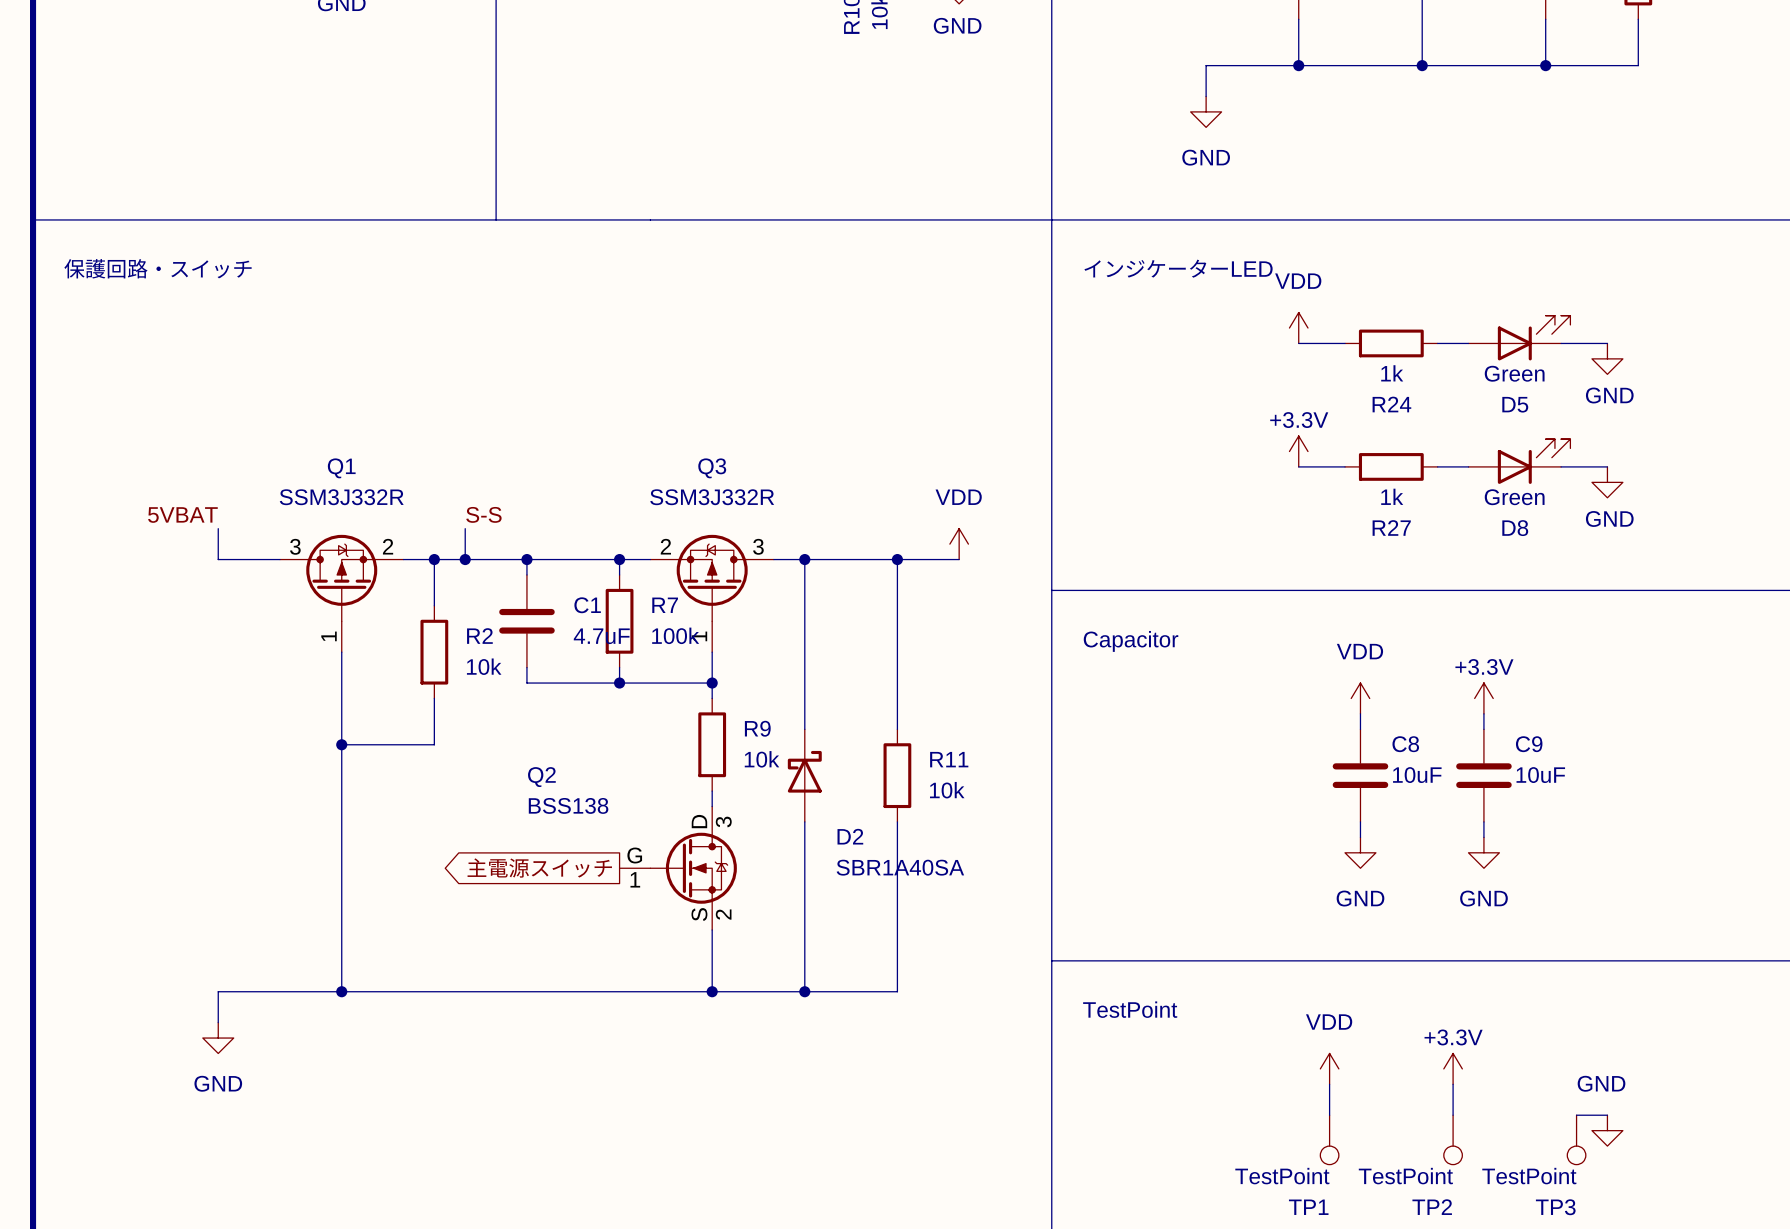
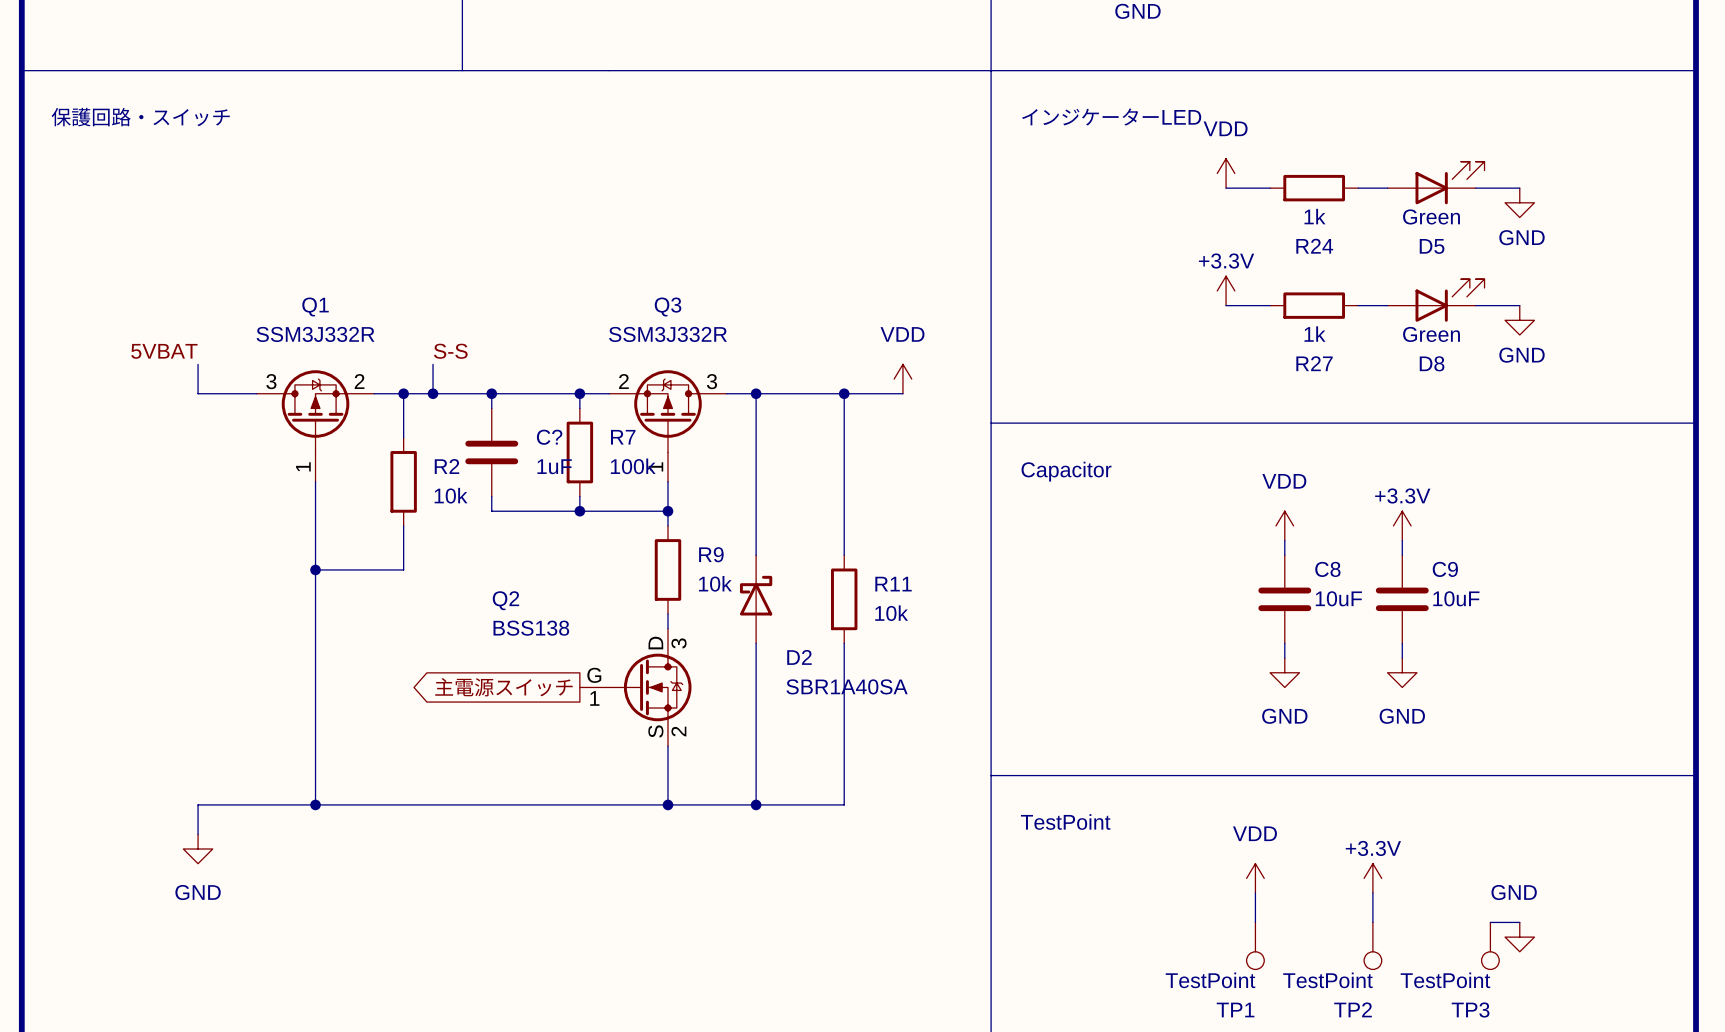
C1 name: C1 (587, 605) -> C? (549, 437)
C1 value: 4.7uF (601, 636) -> 1uF (554, 466)

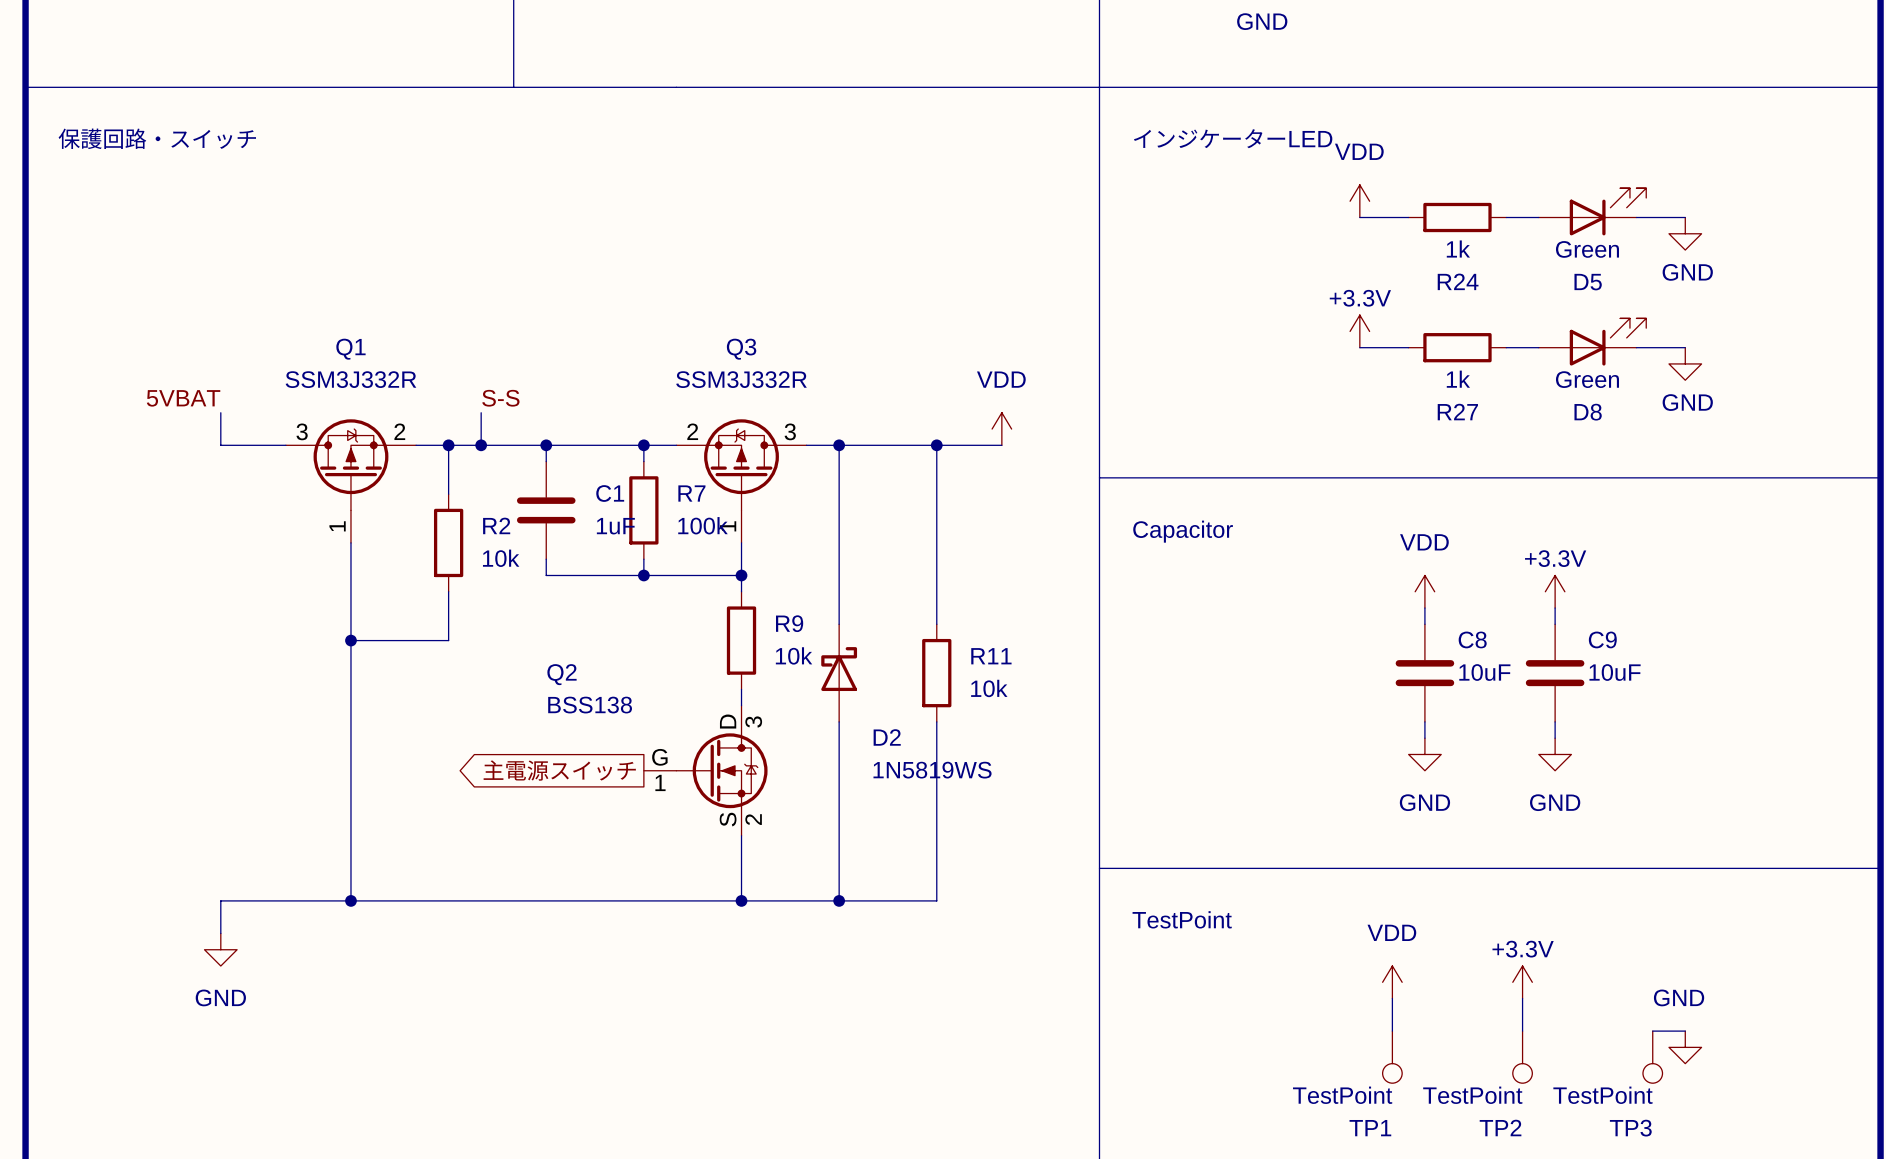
C? name: C? (549, 437) -> C1 (610, 493)
D2 value: SBR1A40SA (847, 686) -> 1N5819WS (932, 770)

